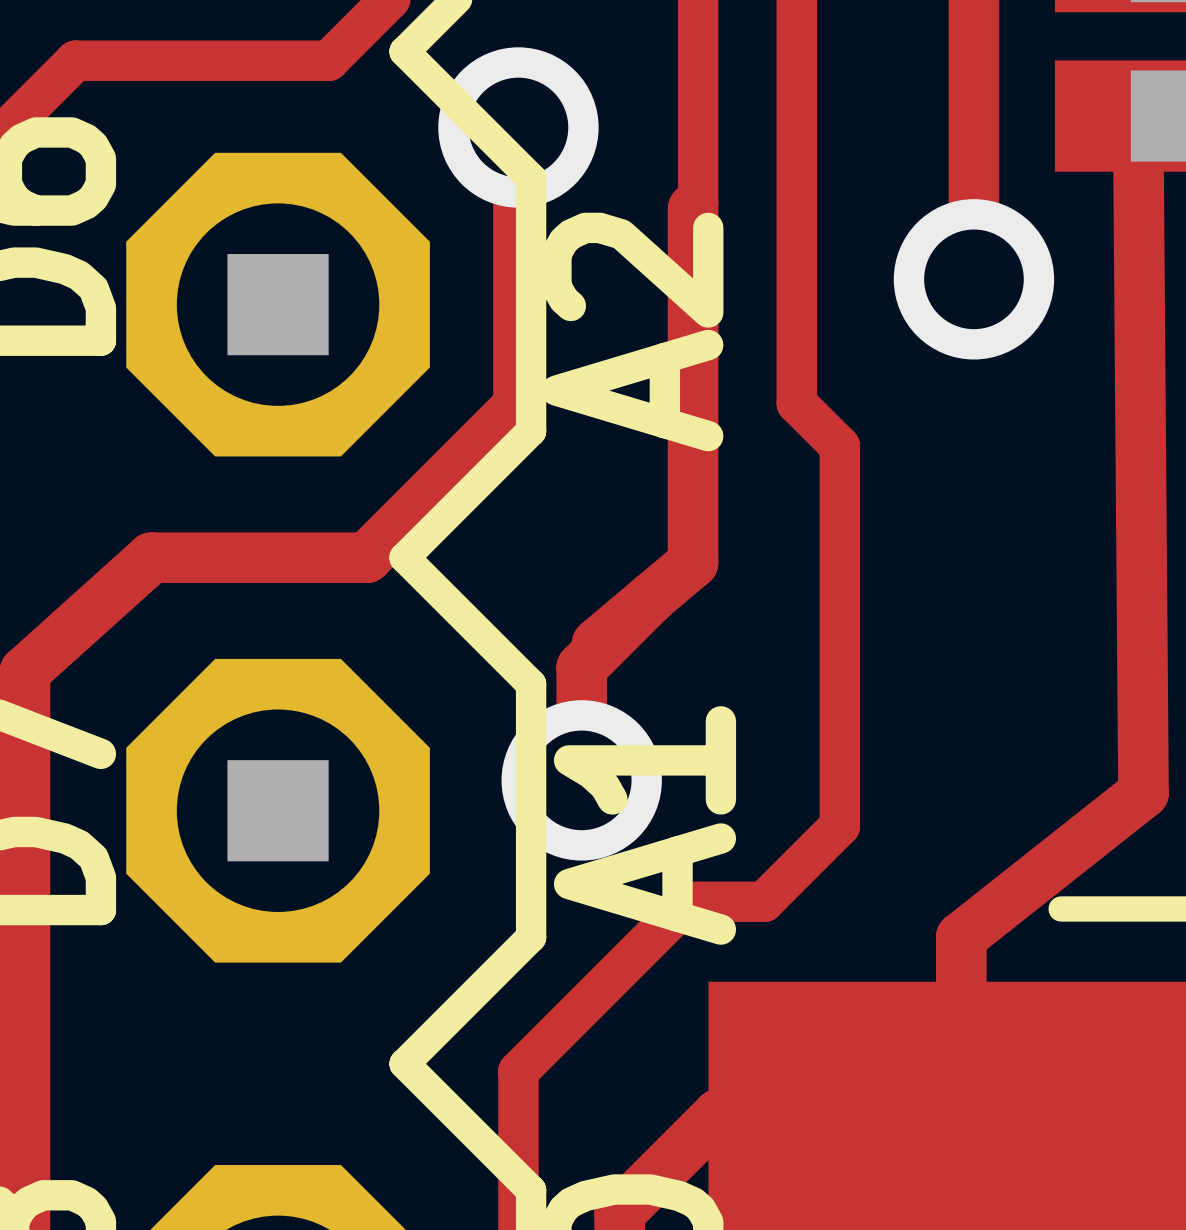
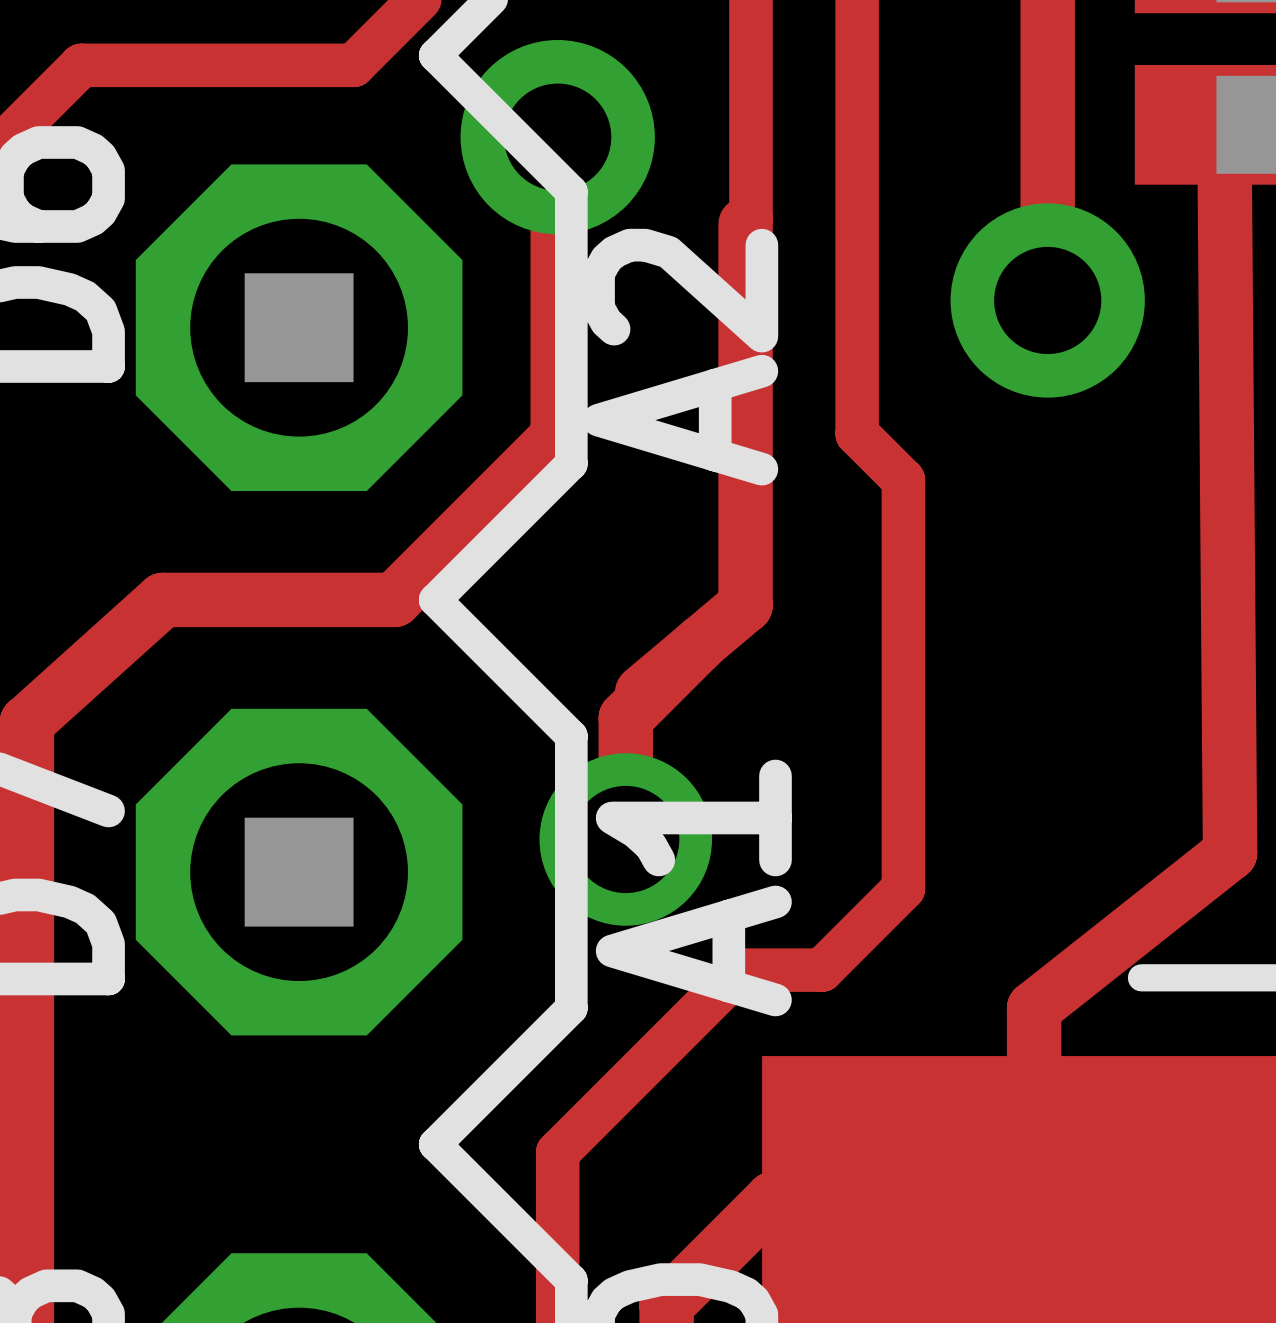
via size: [438, 47, 599, 208] -> [460, 40, 655, 235]
via size: [893, 199, 1055, 360] -> [950, 203, 1145, 398]

